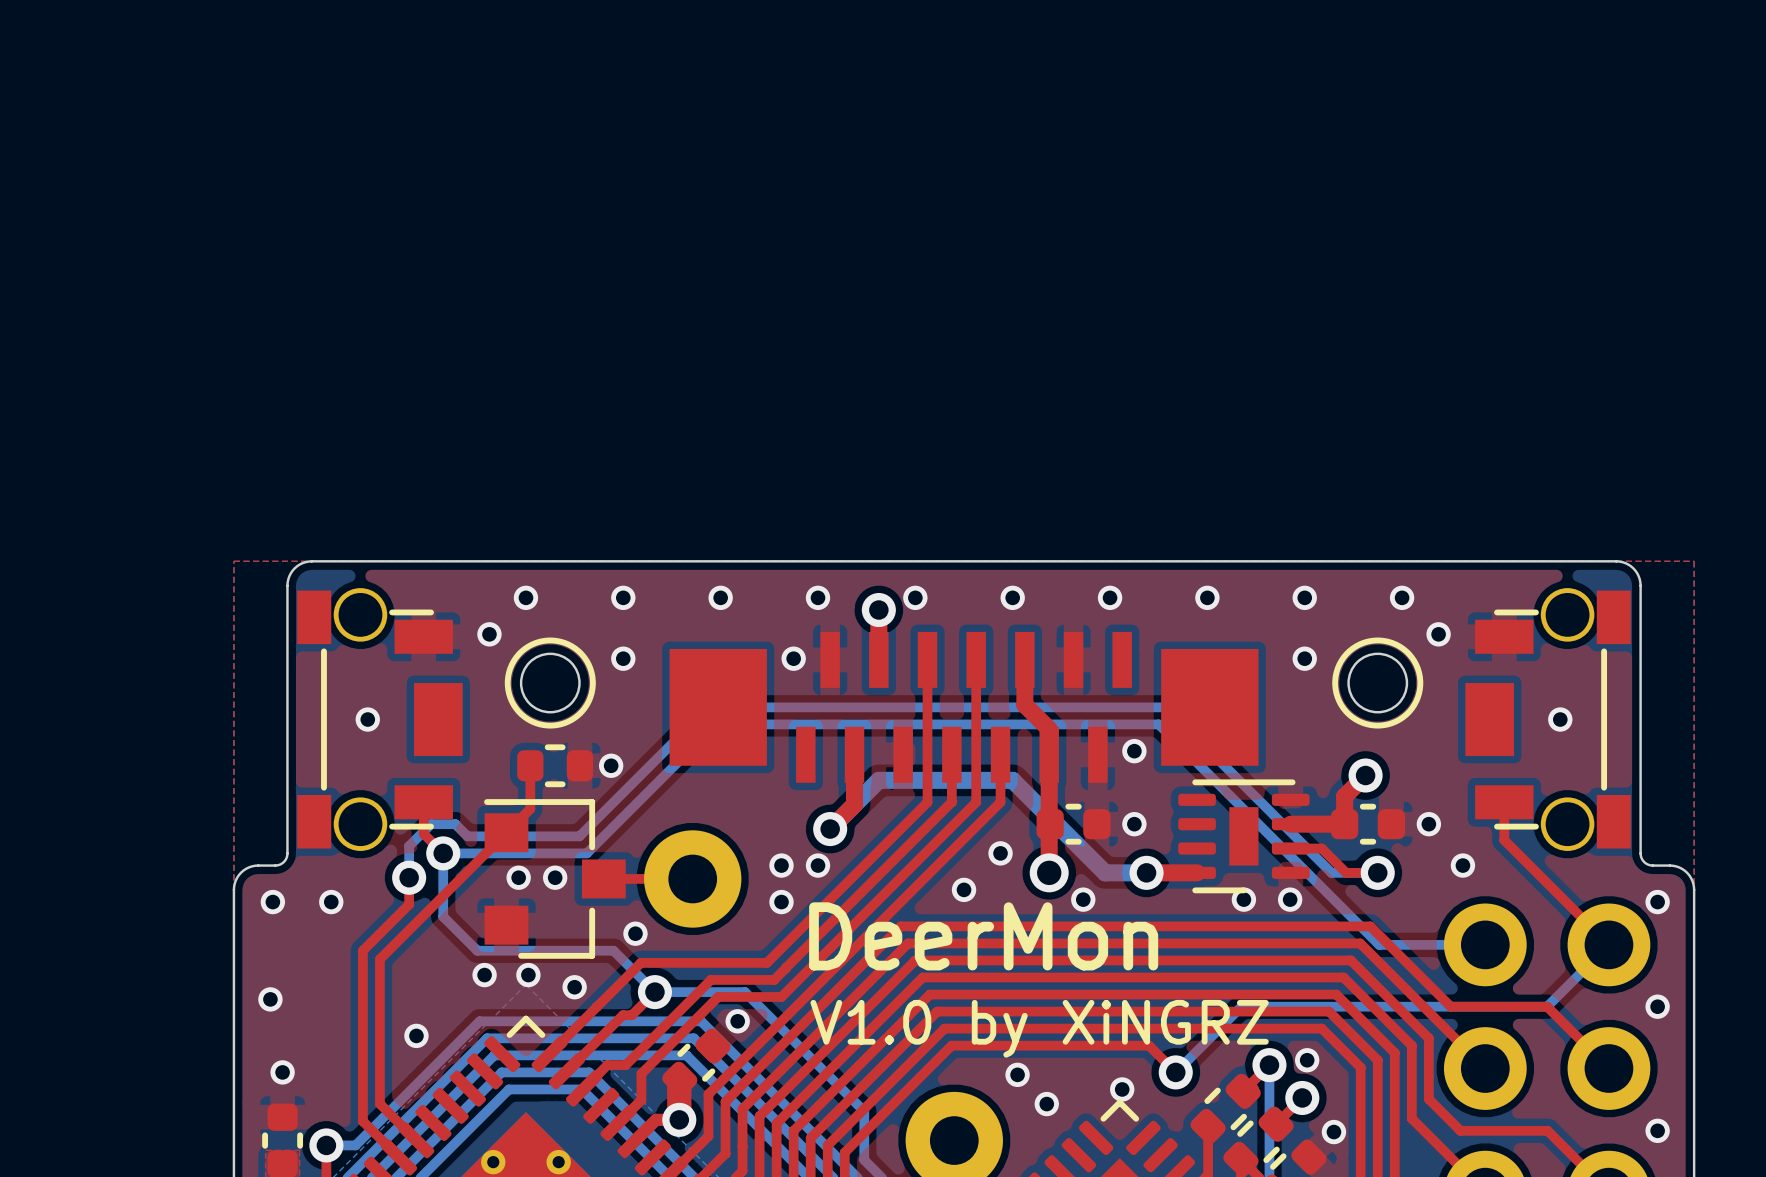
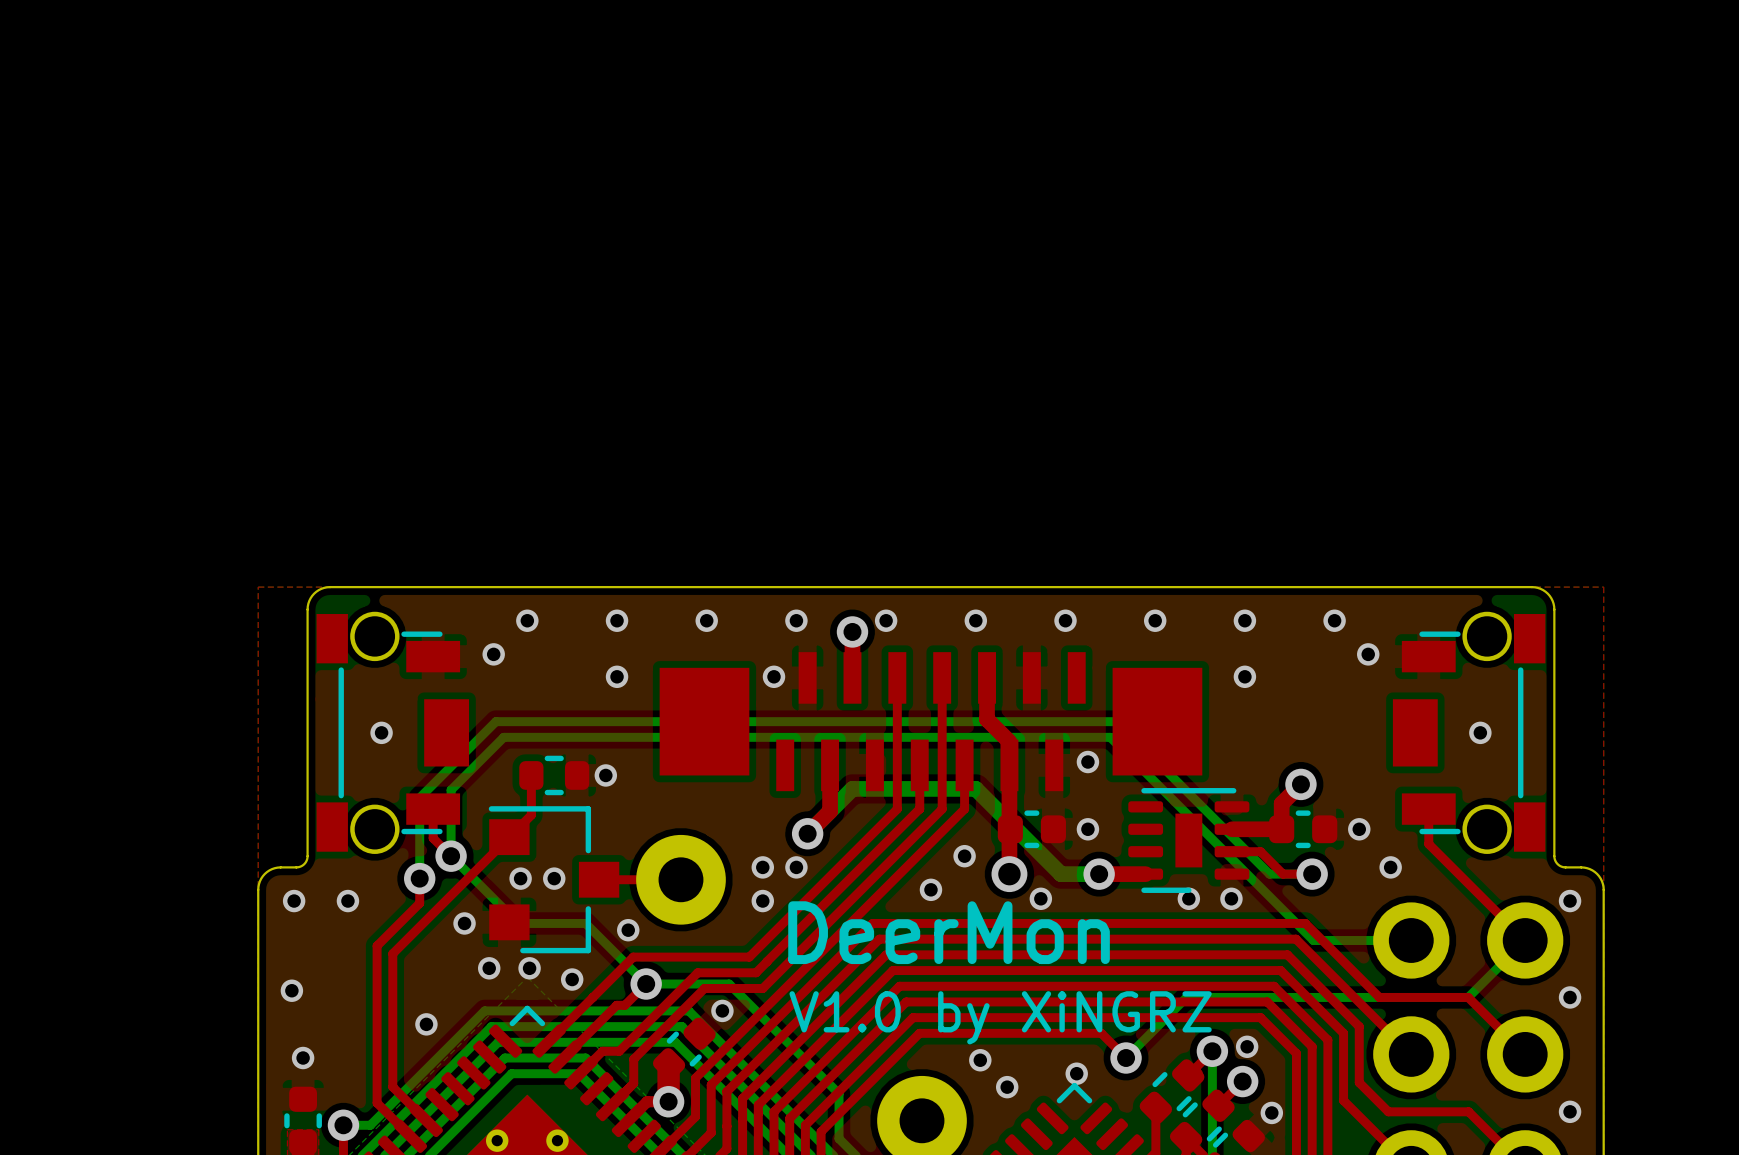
drawing: [504, 637, 596, 729] -> none
drawing: [1332, 637, 1424, 729] -> none
round board edge: [519, 652, 581, 714] -> none
round board edge: [1347, 652, 1409, 714] -> none
bottom track: (708, 707) (579, 836) (467, 836) (455, 824) (431, 824) (409, 846) -> (695, 721) (495, 721) (419, 797) (419, 849)
bottom track: (715, 724) (586, 853) (443, 853) (443, 916) (477, 950) (613, 950) -> (702, 737) (503, 737) (451, 790) (451, 856) (518, 923) (585, 923) (608, 945)
via: none -> (464, 923)

